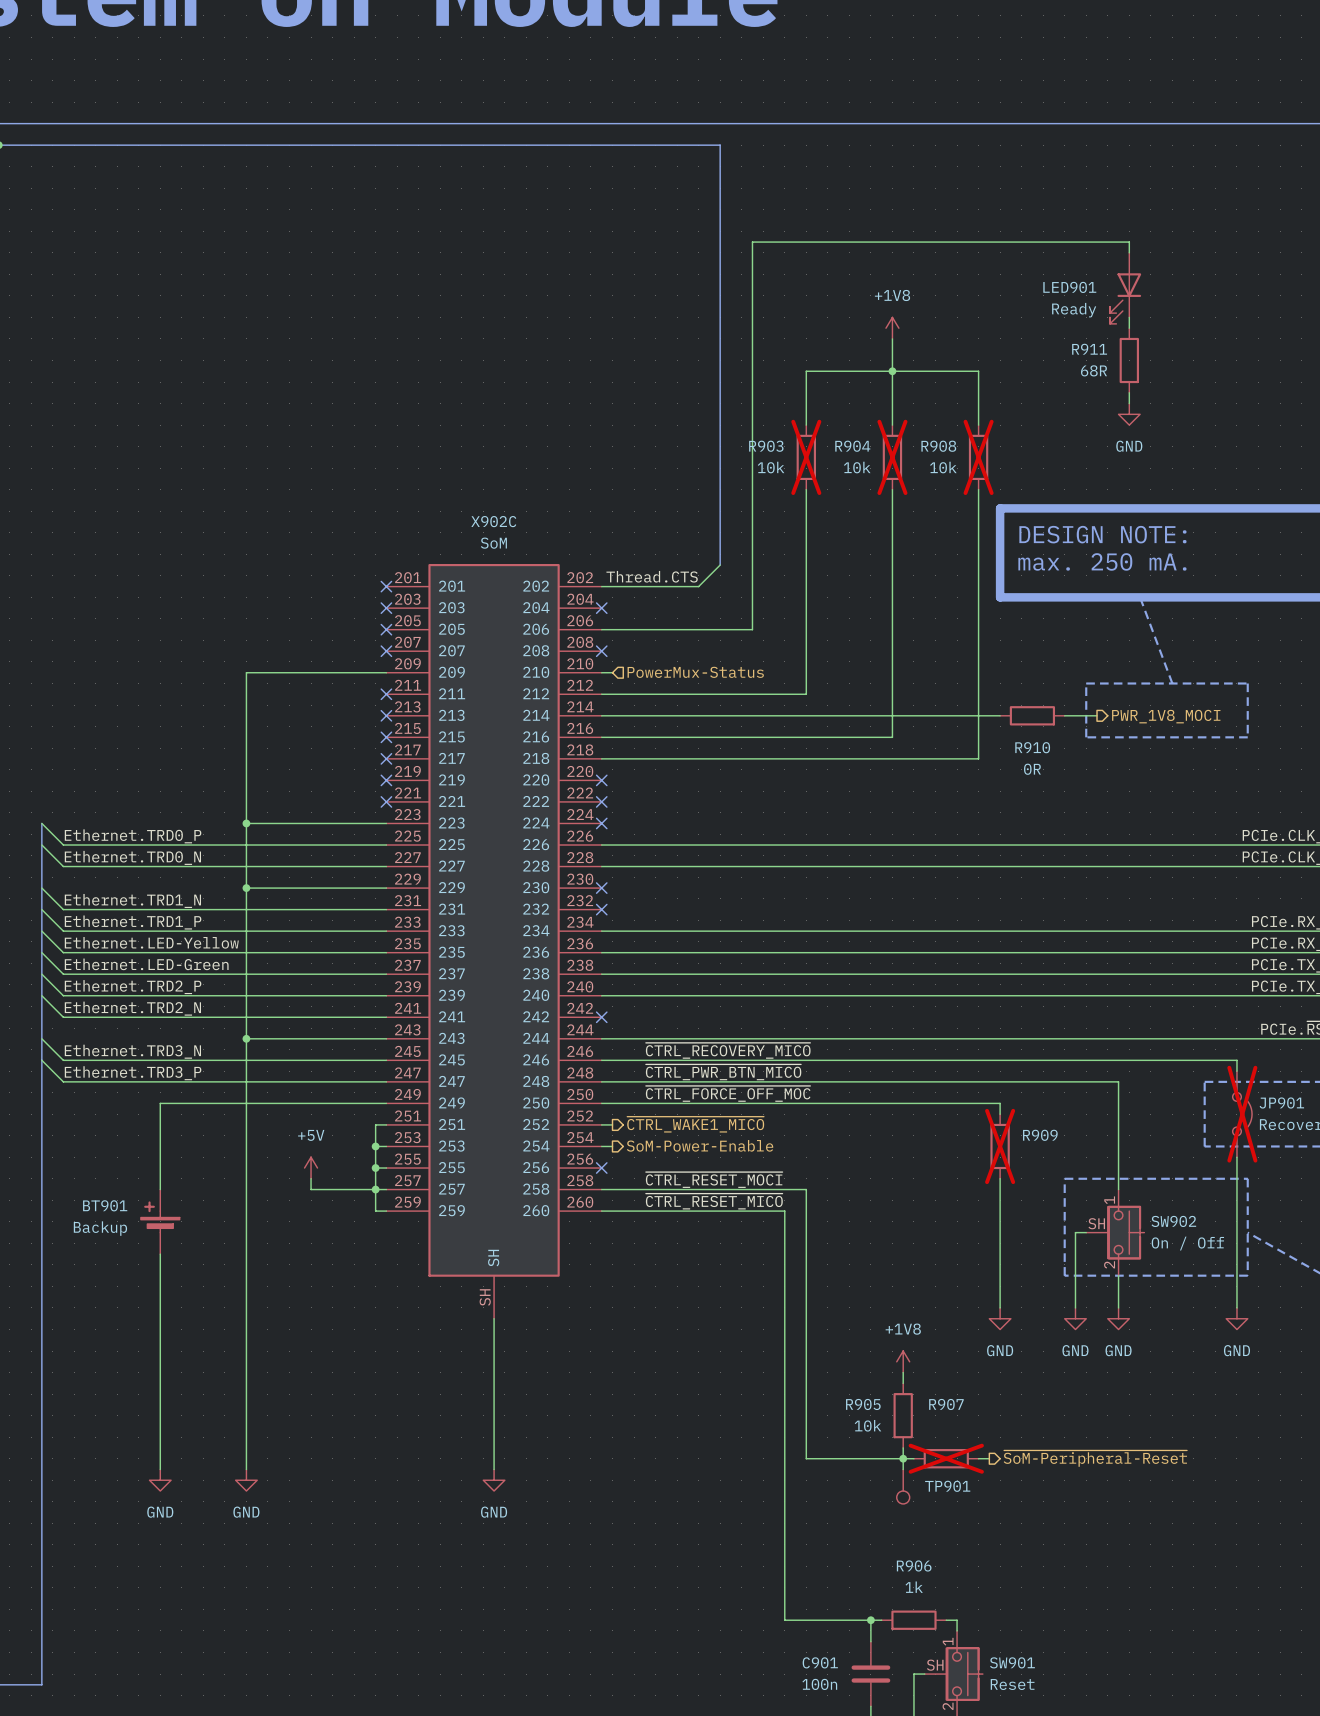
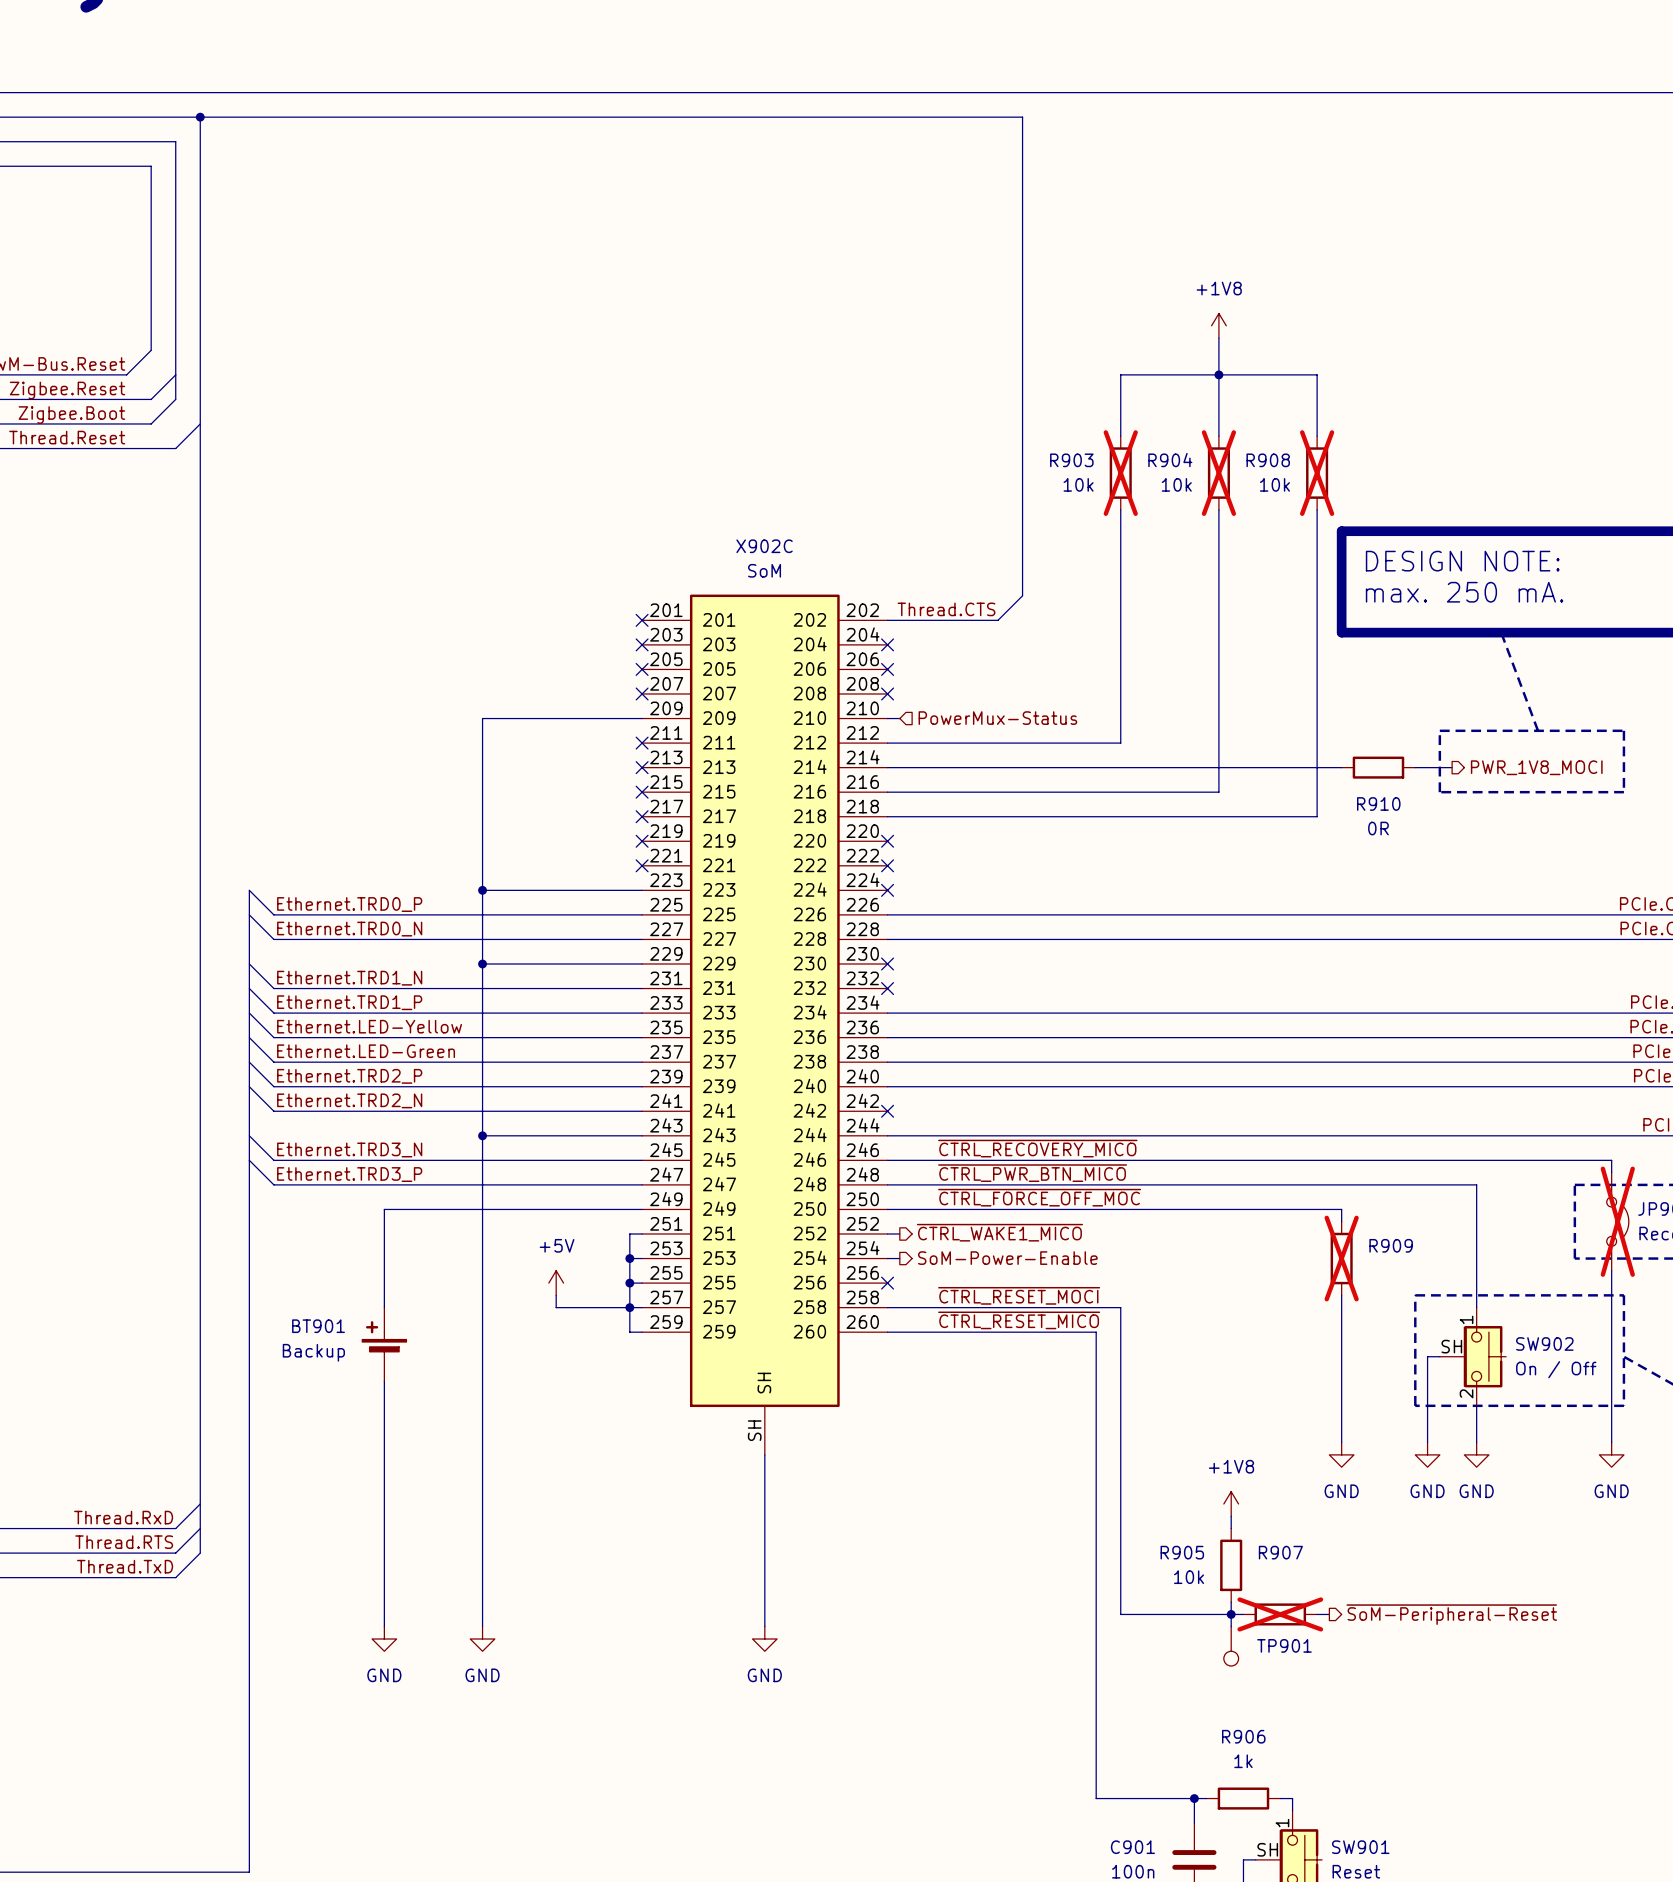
wire: (1129, 252) (1129, 242) (752, 242) (752, 629) (601, 629) -> none
LED901: Ready (1125, 288) -> none
wire: (1129, 317) (1129, 328) -> none
R911: 68R (1129, 360) -> none
wire: (1129, 392) (1129, 403) -> none
power symbol: GND (1129, 414) -> none
no-connect mark: none -> (887, 669)

